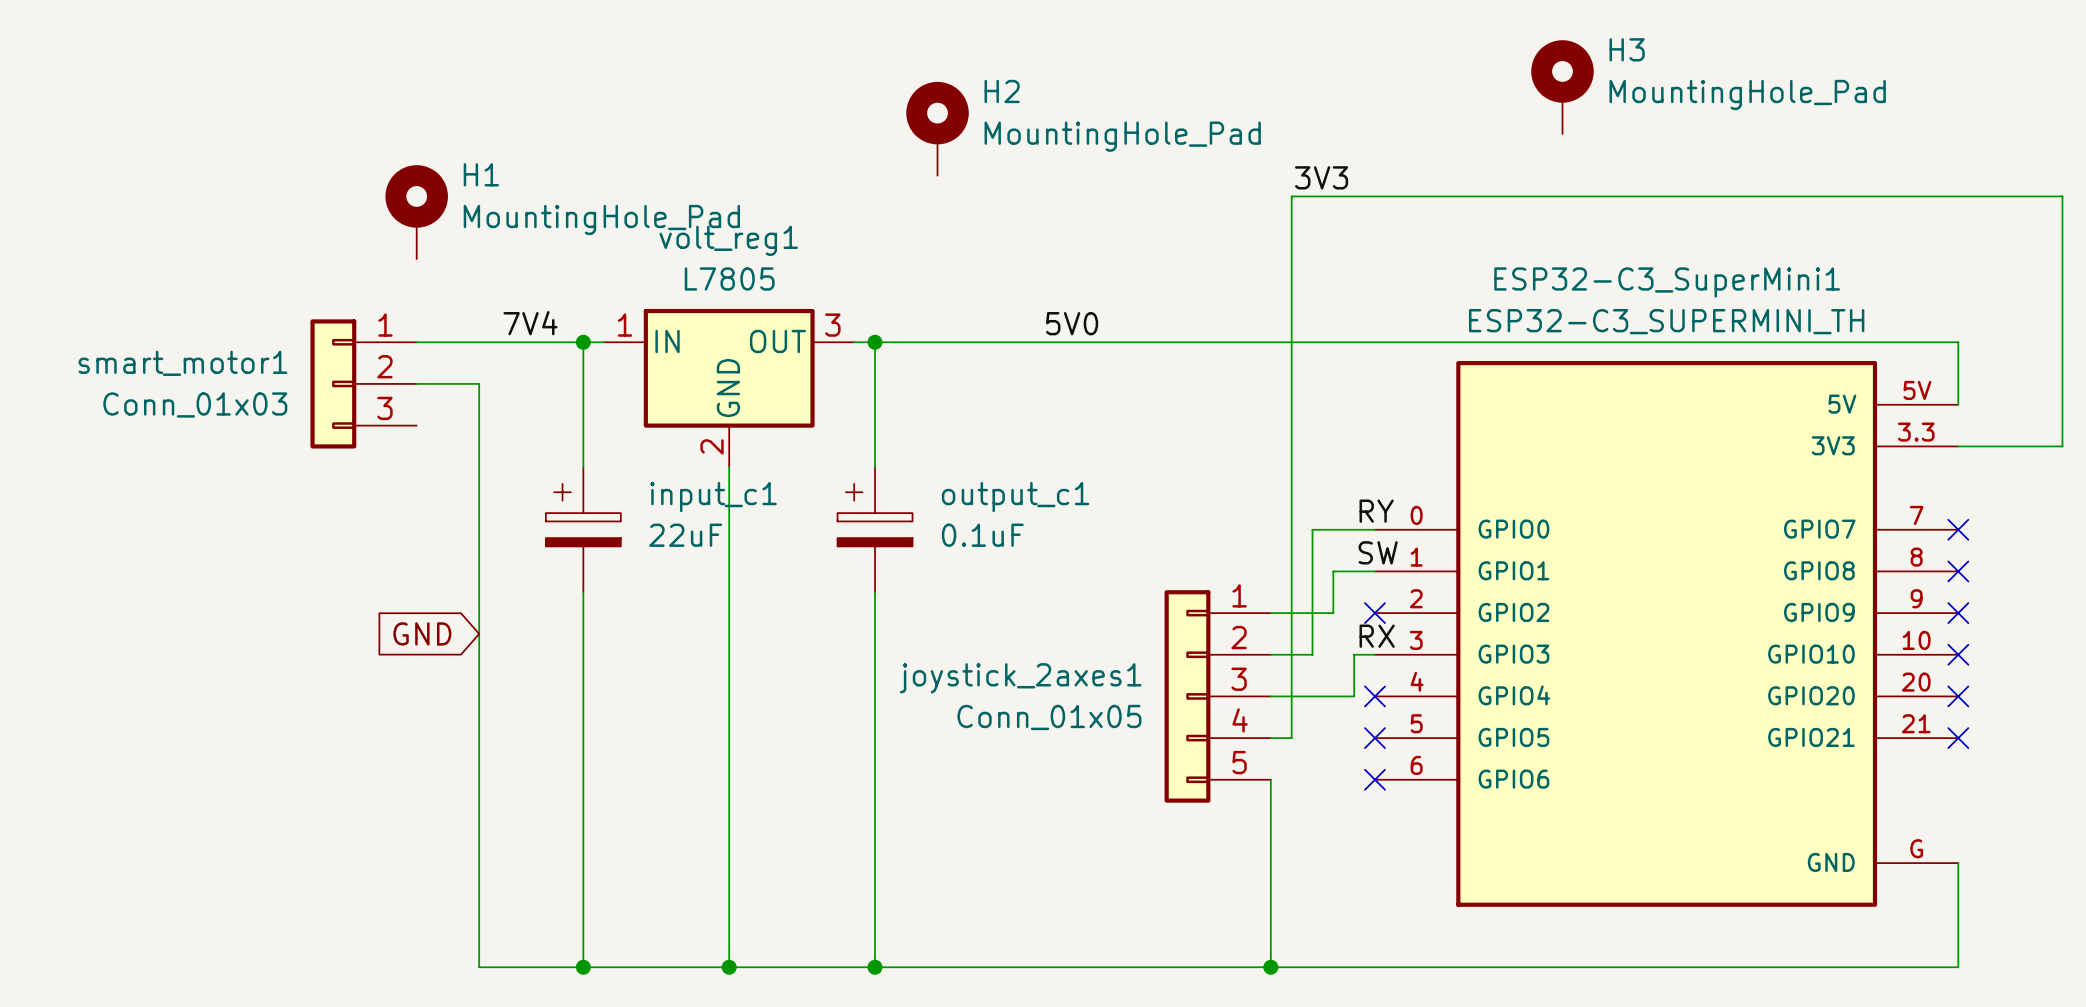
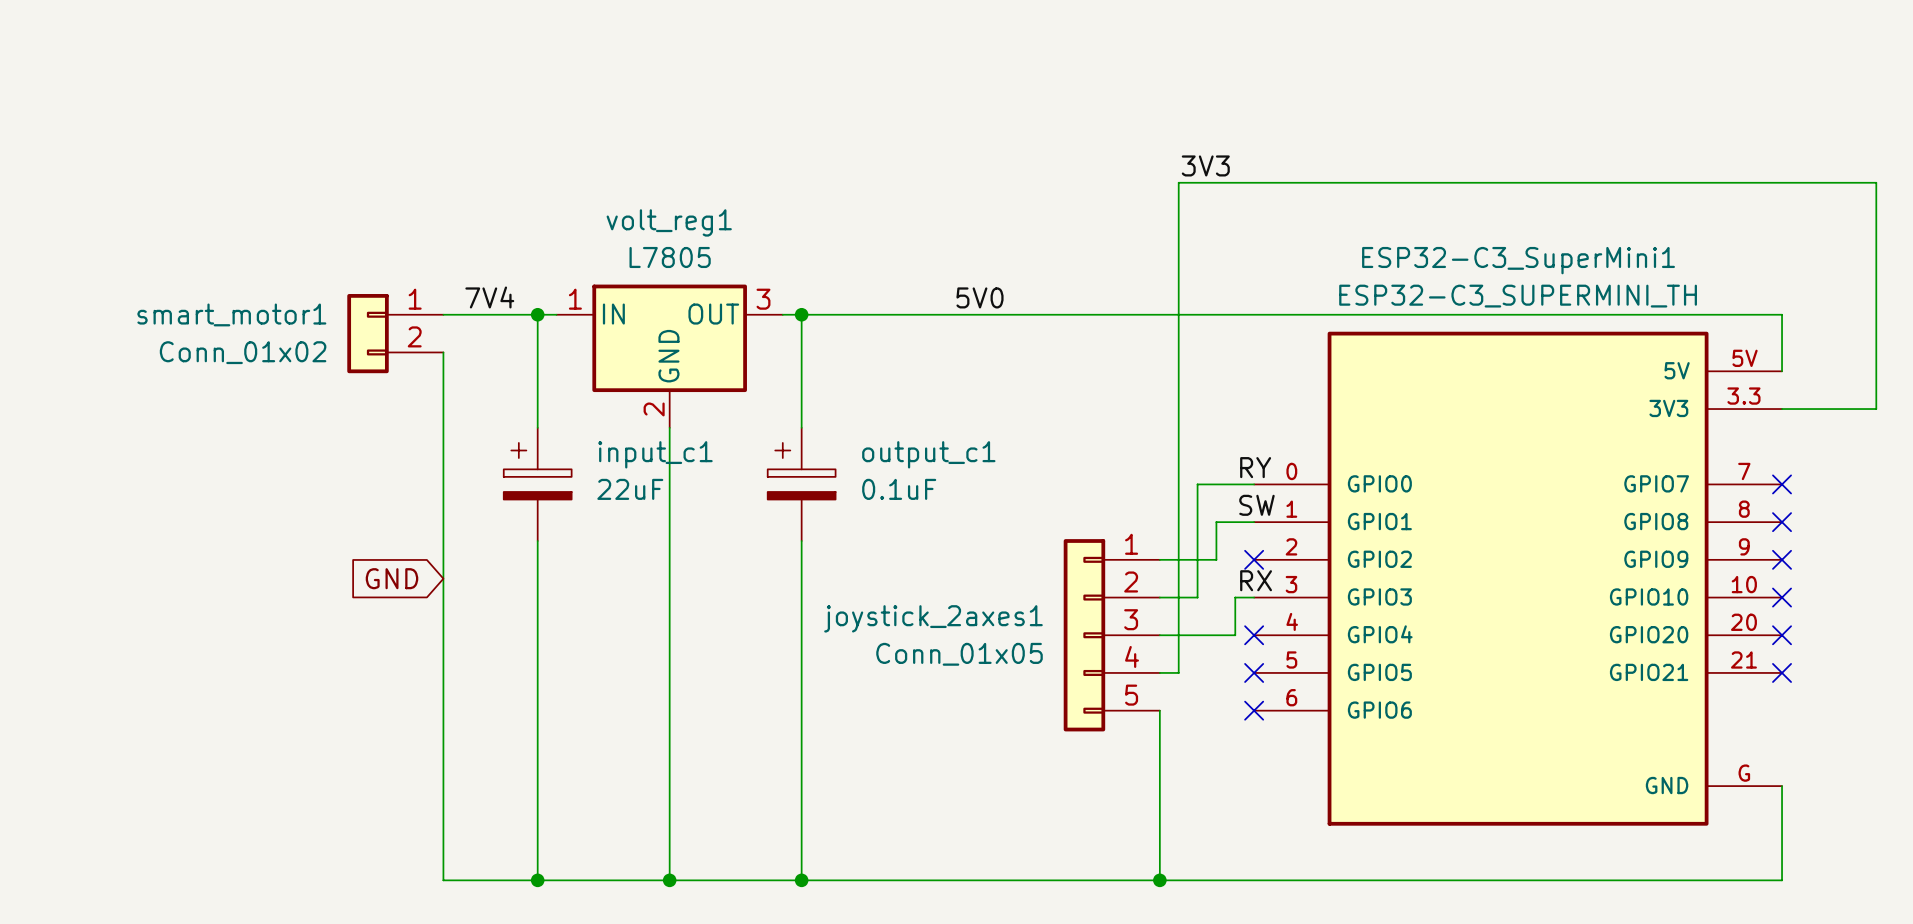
H3: MountingHole_Pad (1562, 87) -> none
H2: MountingHole_Pad (937, 128) -> none
H1: MountingHole_Pad (416, 212) -> none
smart_motor1 symbol: [310, 319, 417, 449] -> [347, 294, 444, 374]
smart_motor1 value: Conn_01x03 (195, 404) -> Conn_01x02 (243, 352)

